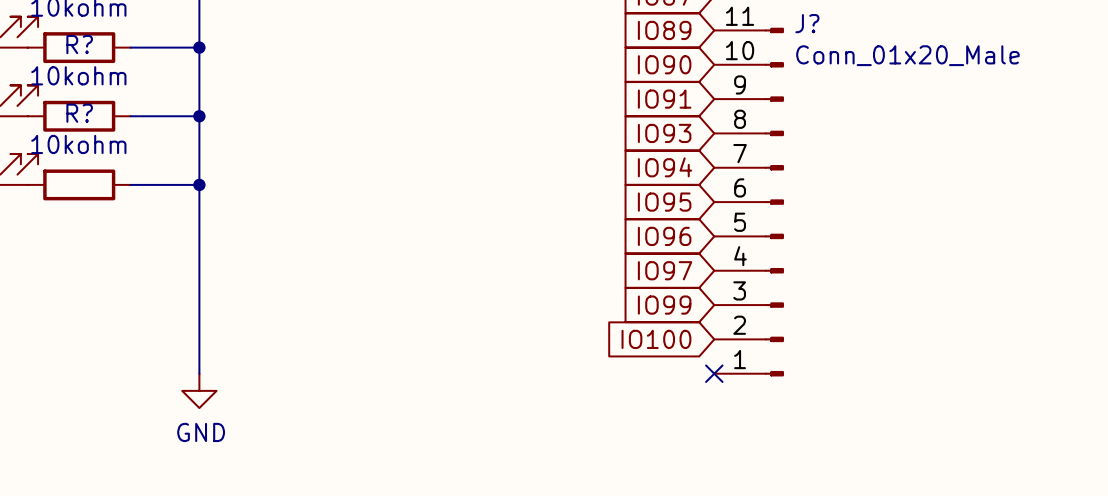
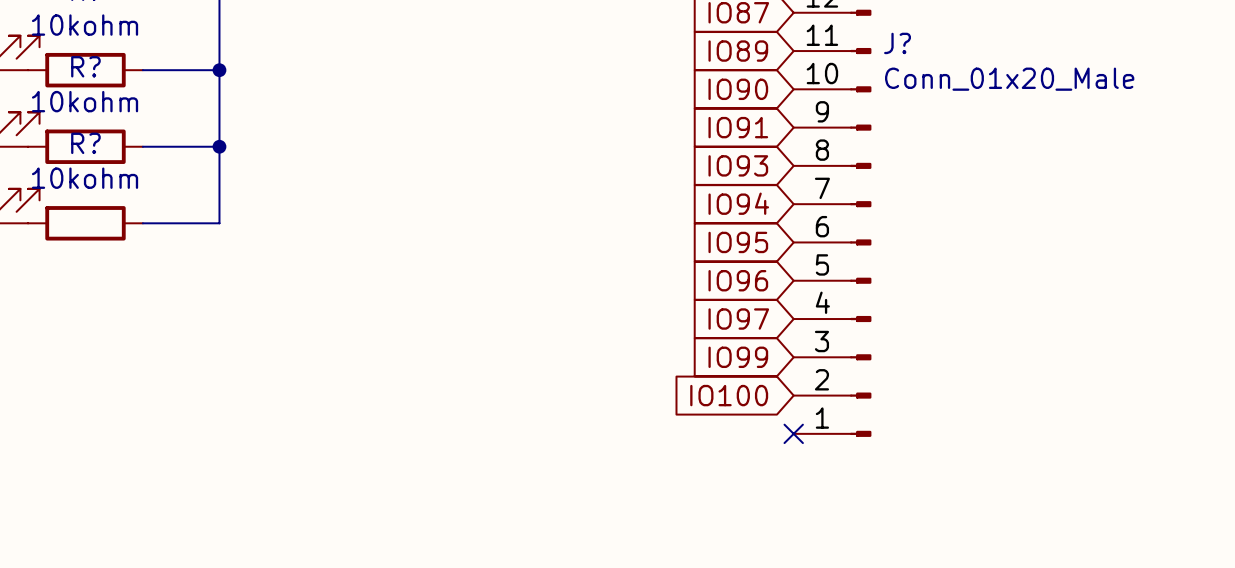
wire: (199, 184) (199, 373) -> none
junction: (199, 184) -> none
power symbol: GND (199, 390) -> none

